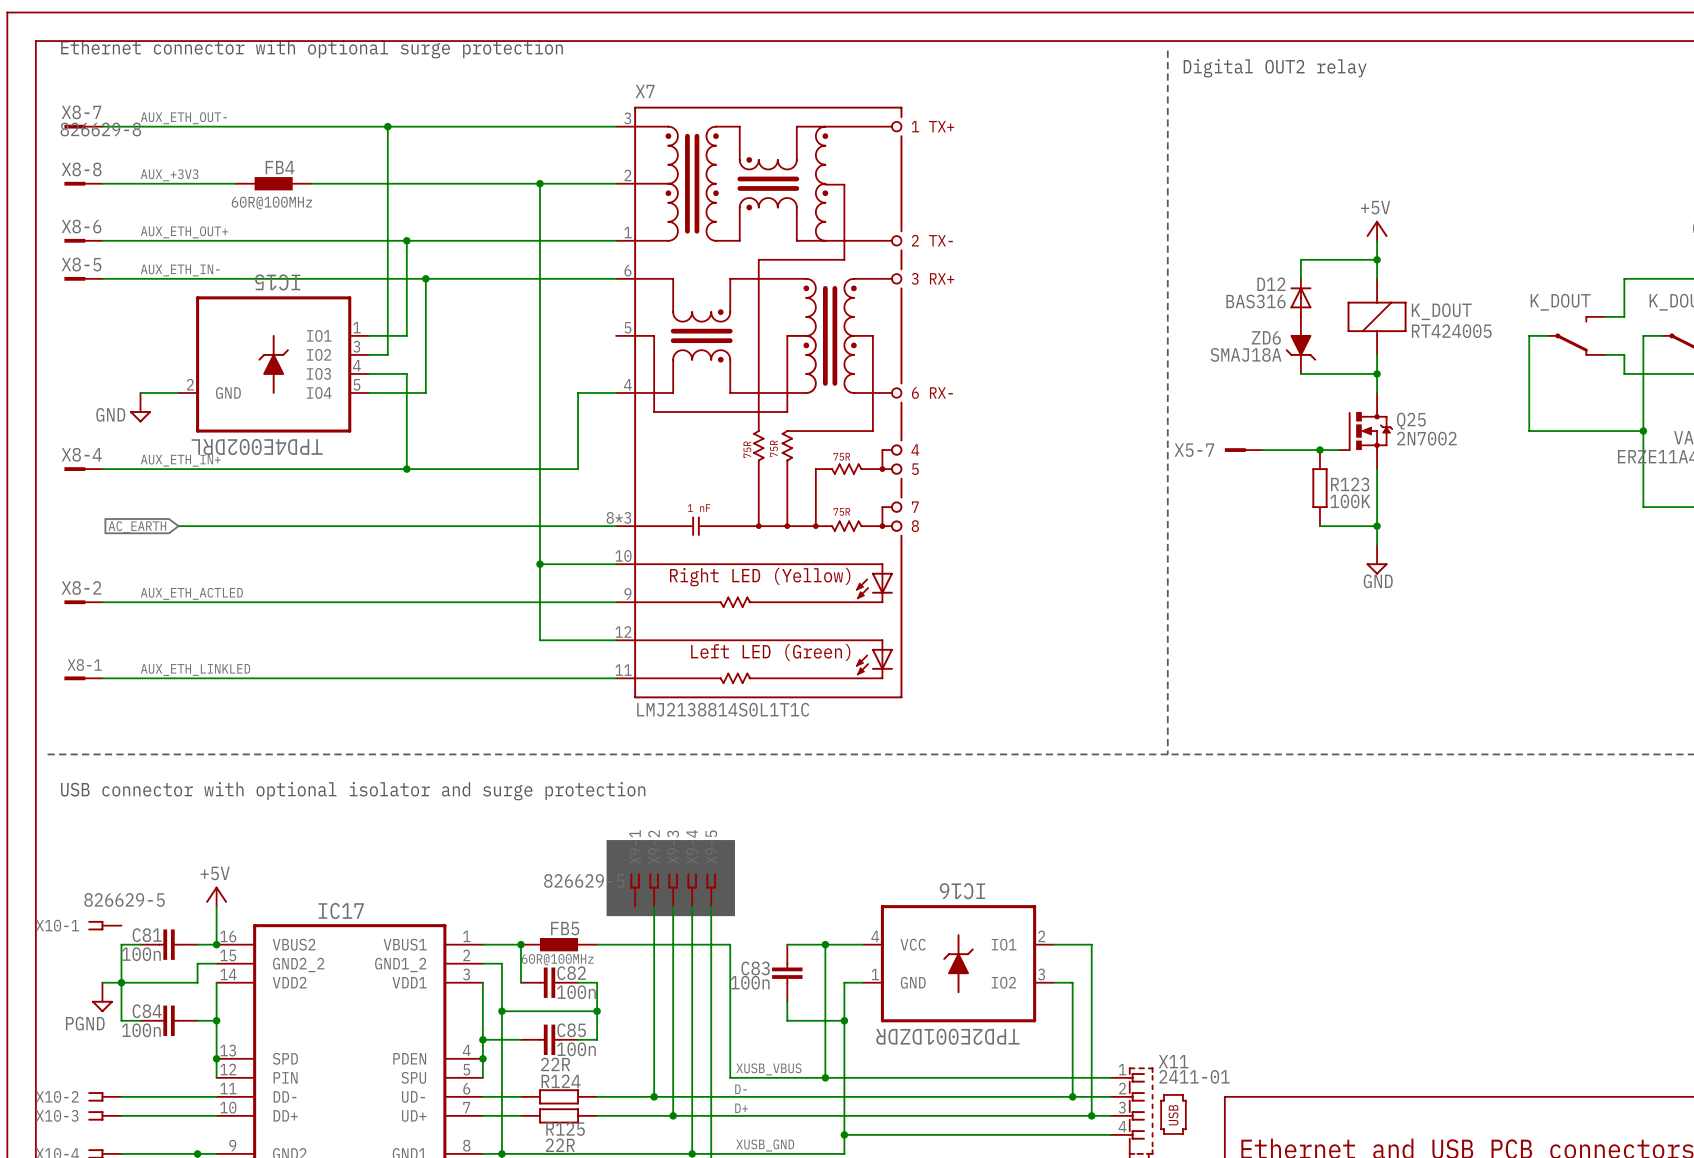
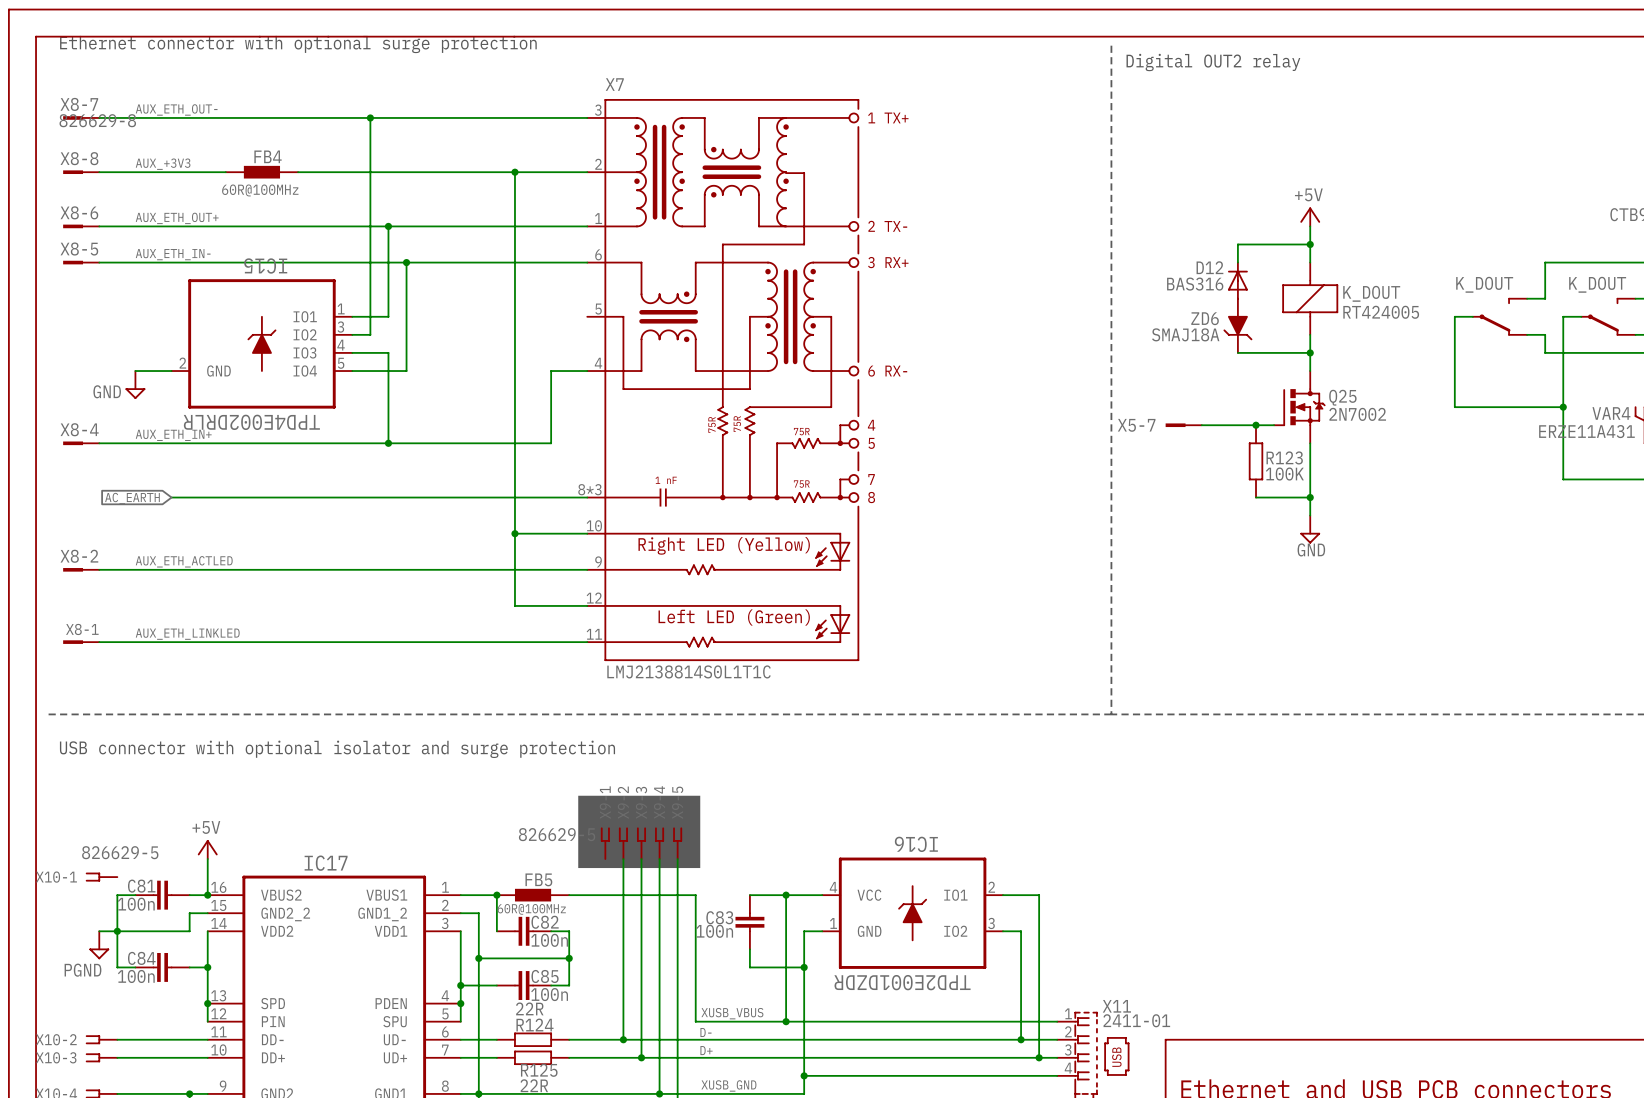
IC15 value: TPD4E002DRL (257, 447) -> TPD4E002DRLR (251, 422)

